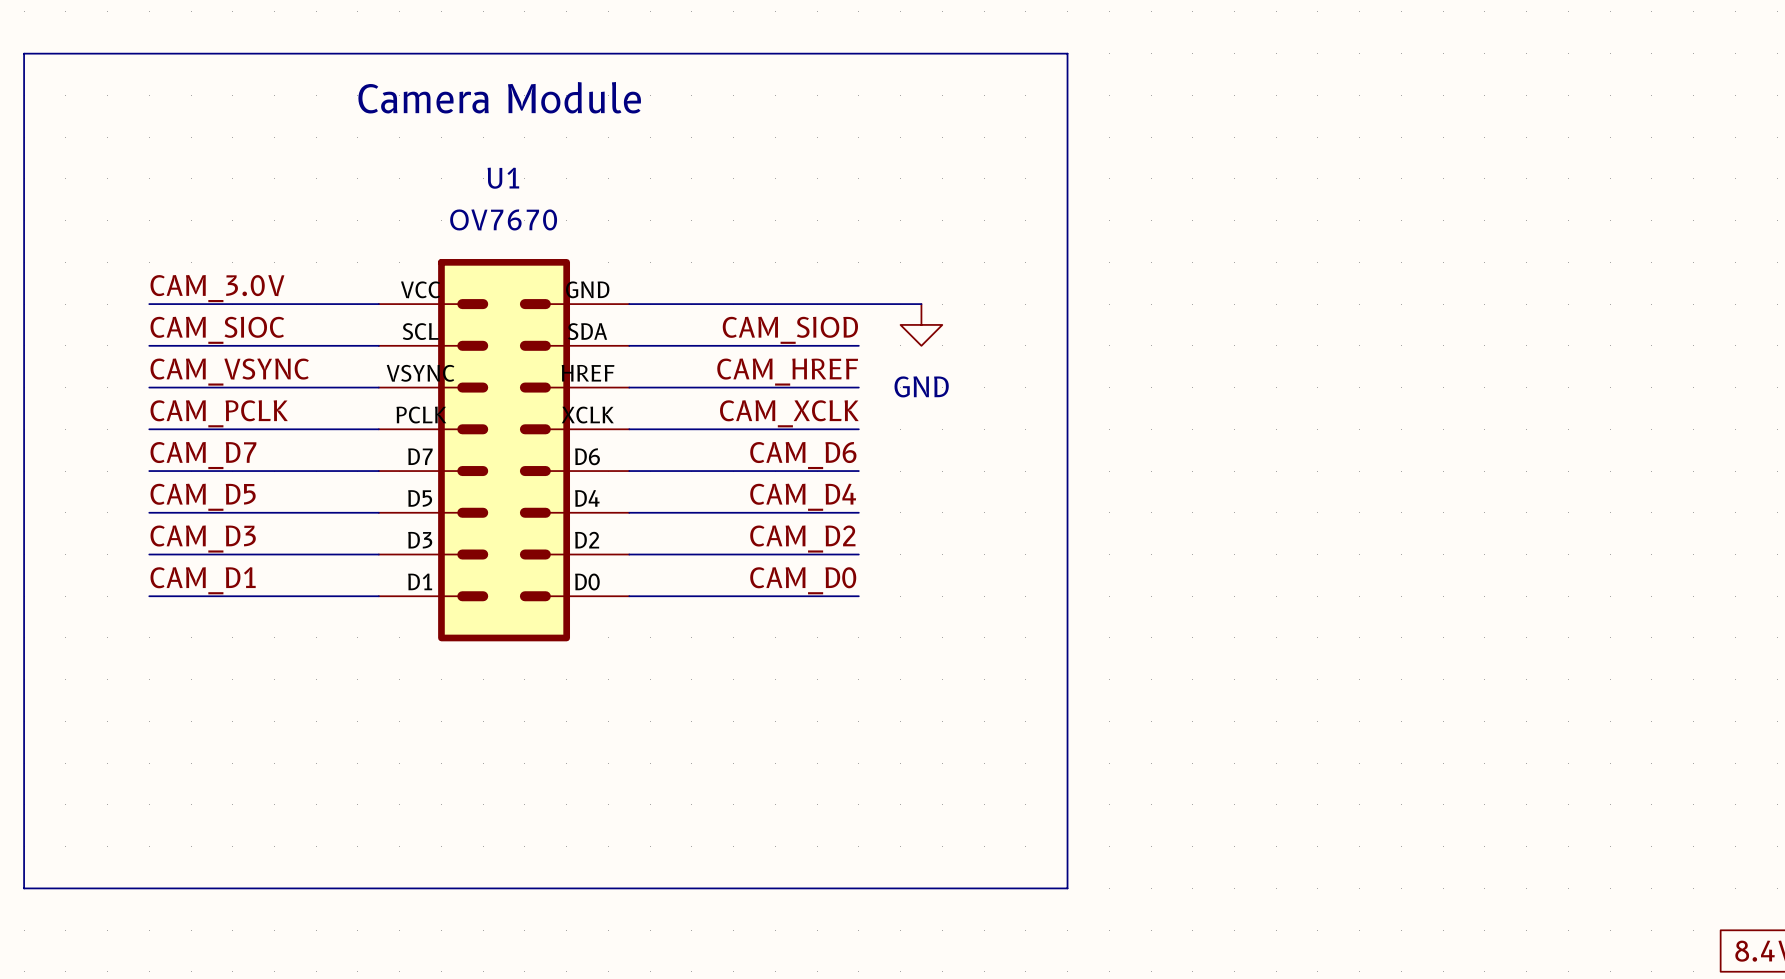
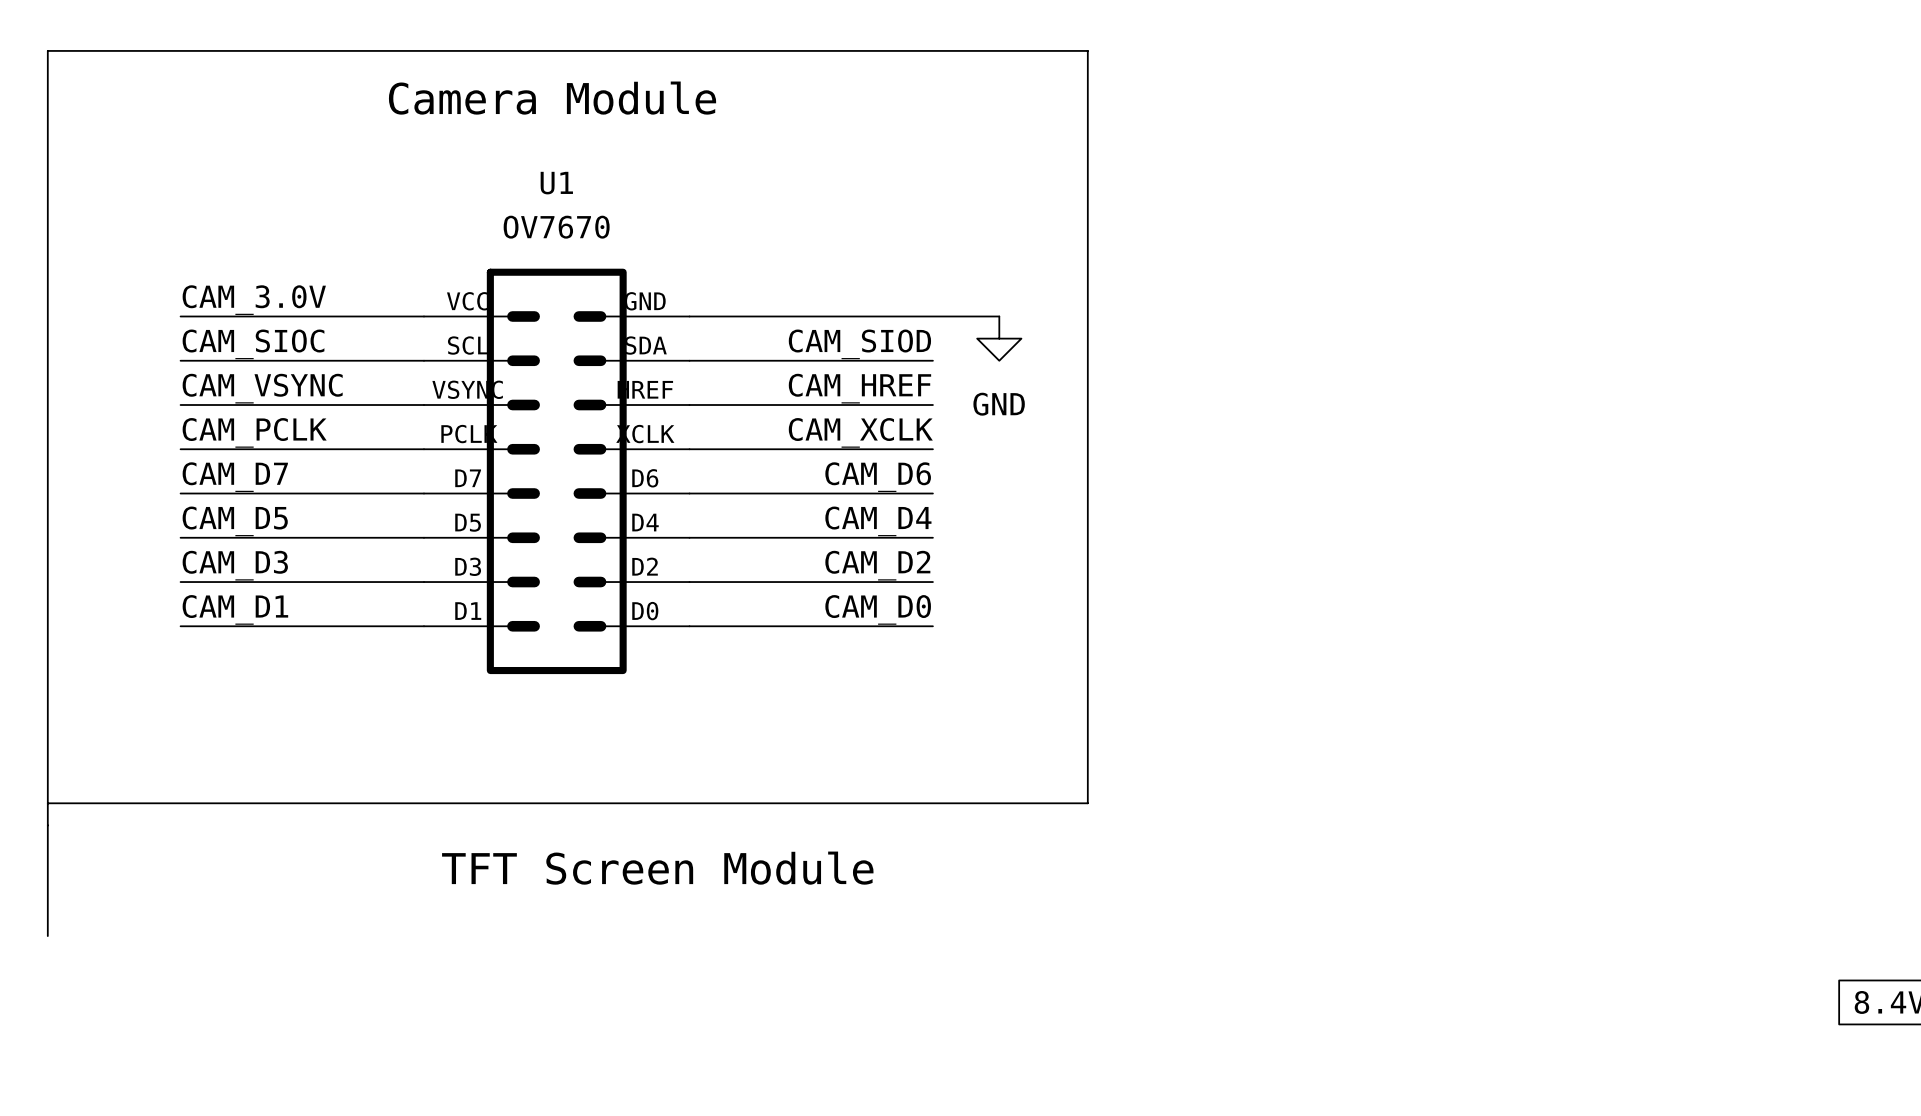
line: (1004, 53) (1067, 53) (1067, 888) (24, 888) -> (1087, 50) (1087, 803) (47, 803)
text: none -> TFT Screen Module (657, 868)

